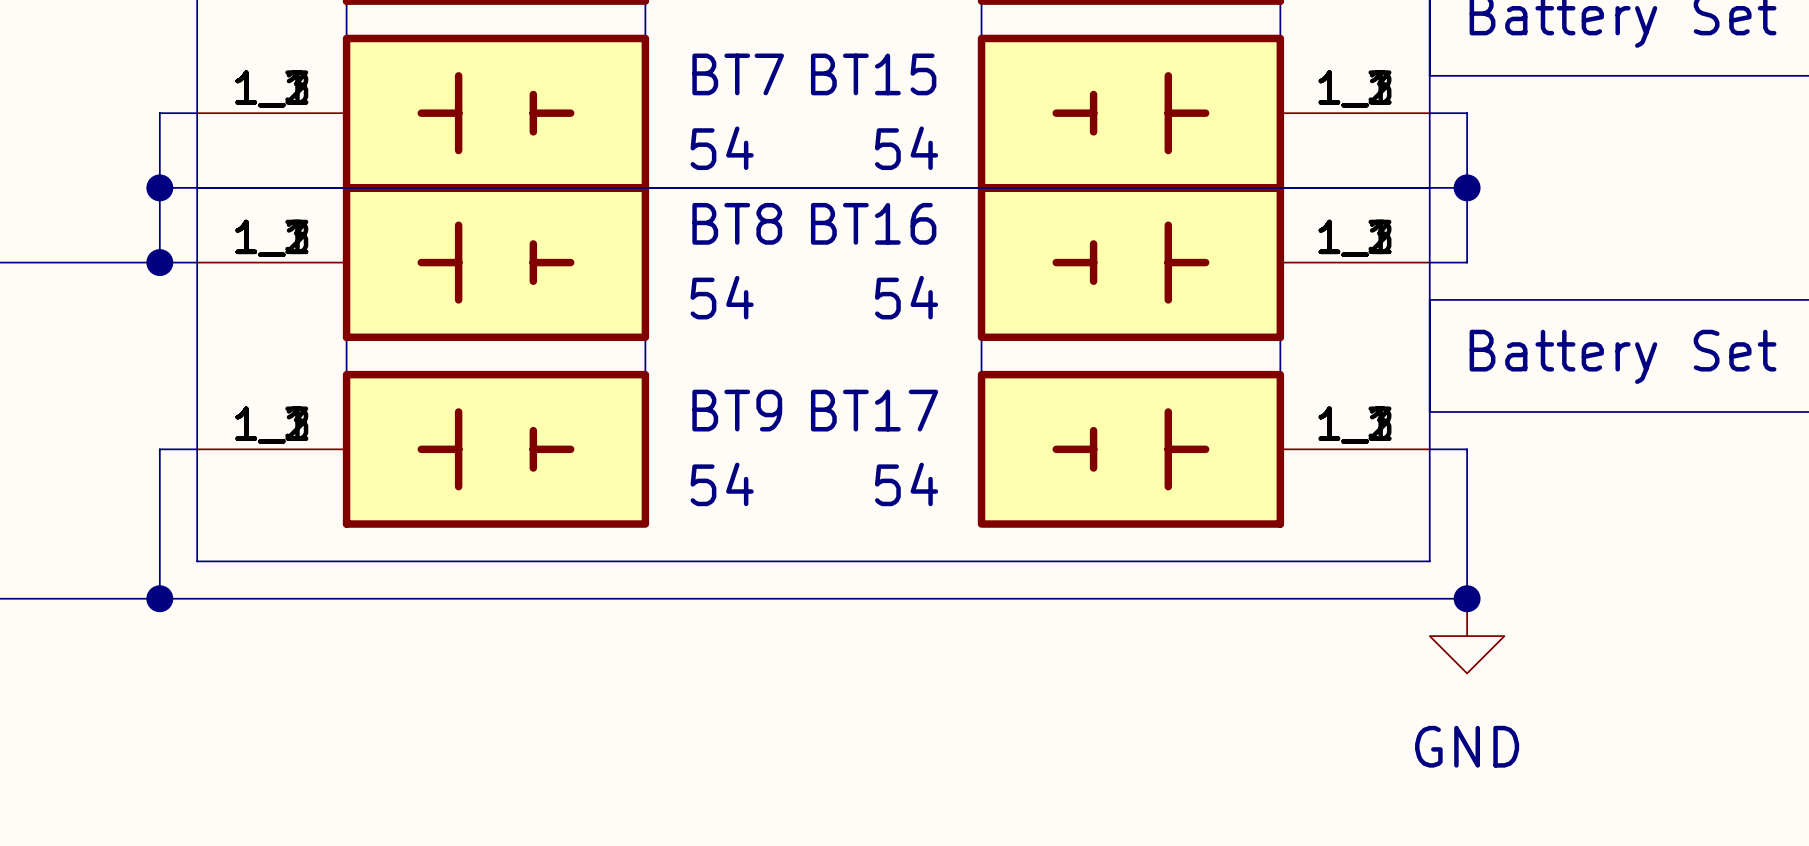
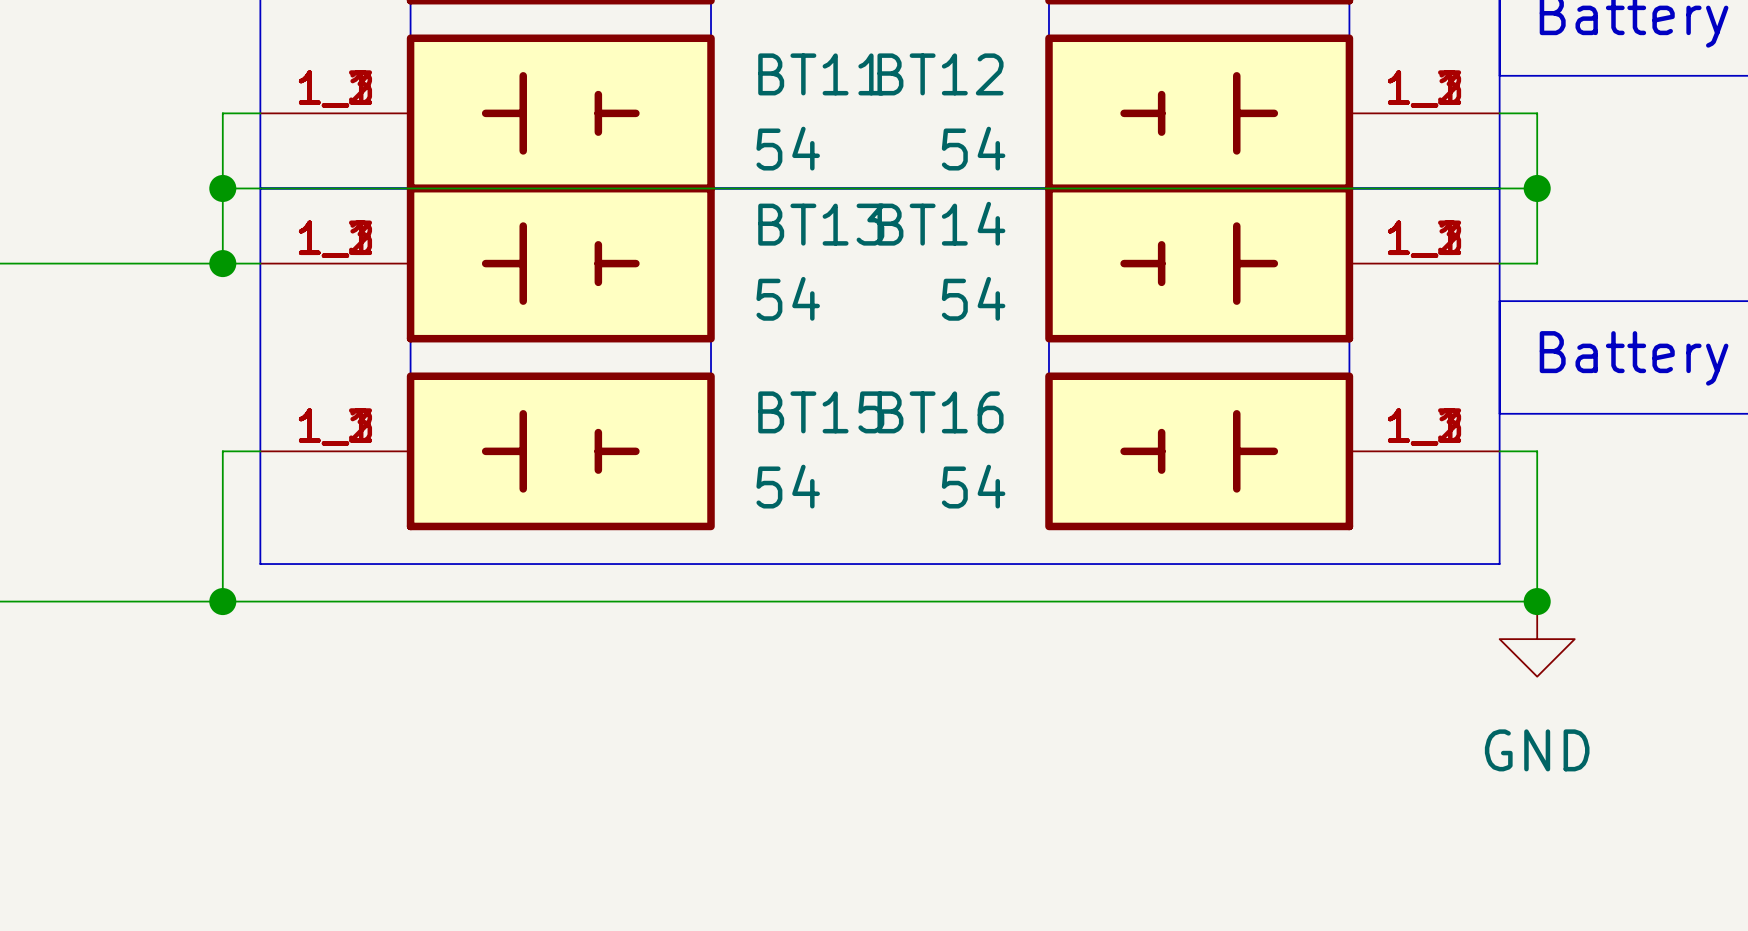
BT7 name: BT7 (738, 74) -> BT11 (821, 74)
BT15 name: BT15 (873, 74) -> BT12 (940, 74)
BT8 name: BT8 (737, 223) -> BT13 (821, 224)
BT16 name: BT16 (873, 223) -> BT14 (941, 223)
BT9 name: BT9 (737, 410) -> BT15 (821, 412)
BT17 name: BT17 (874, 410) -> BT16 (940, 412)

